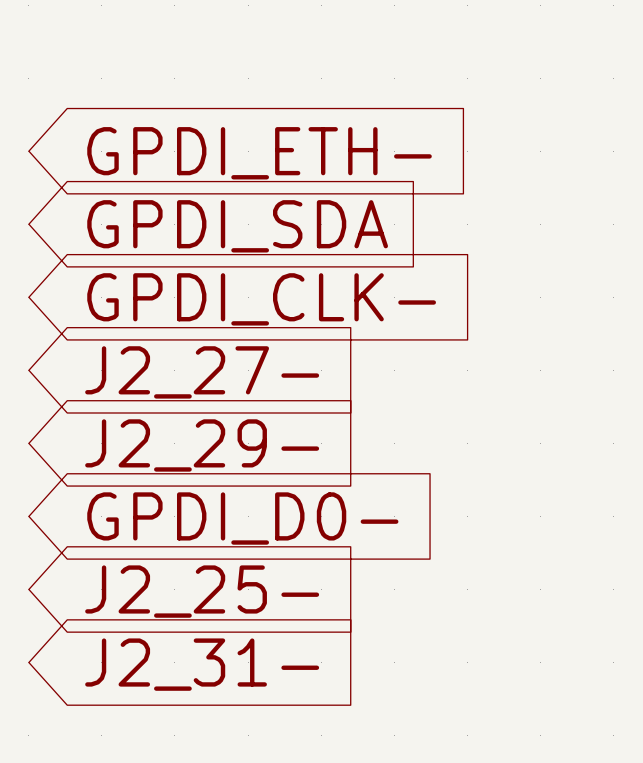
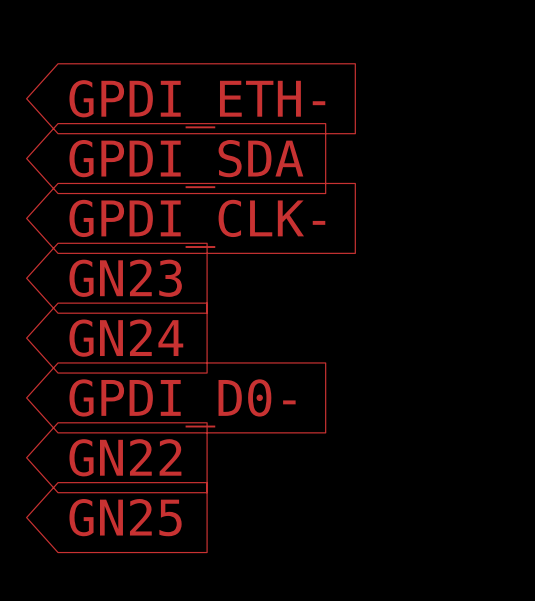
global label: J2_27- (202, 372) -> GN23 (125, 278)
global label: J2_29- (202, 445) -> GN24 (126, 338)
global label: J2_25- (202, 591) -> GN22 (125, 457)
global label: J2_31- (202, 664) -> GN25 (125, 517)

